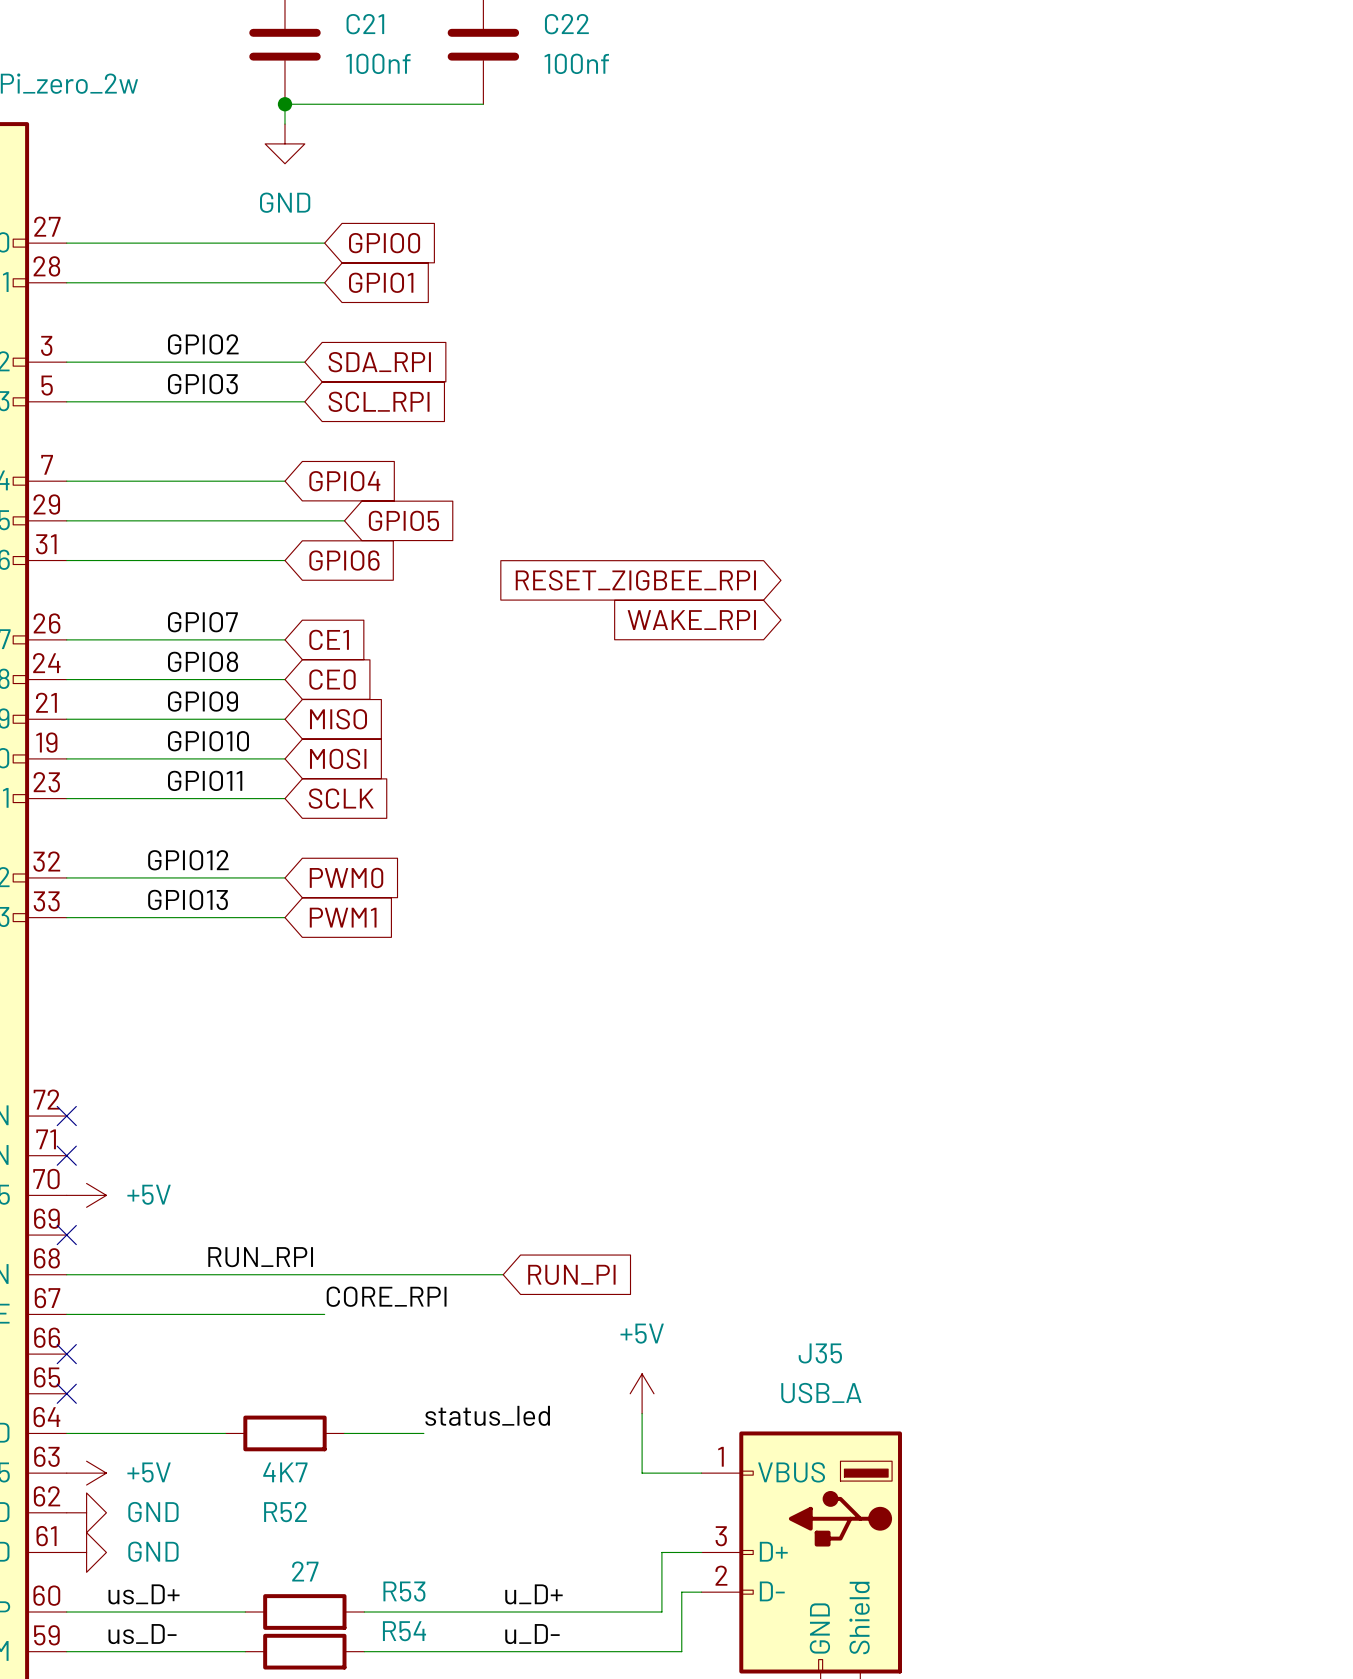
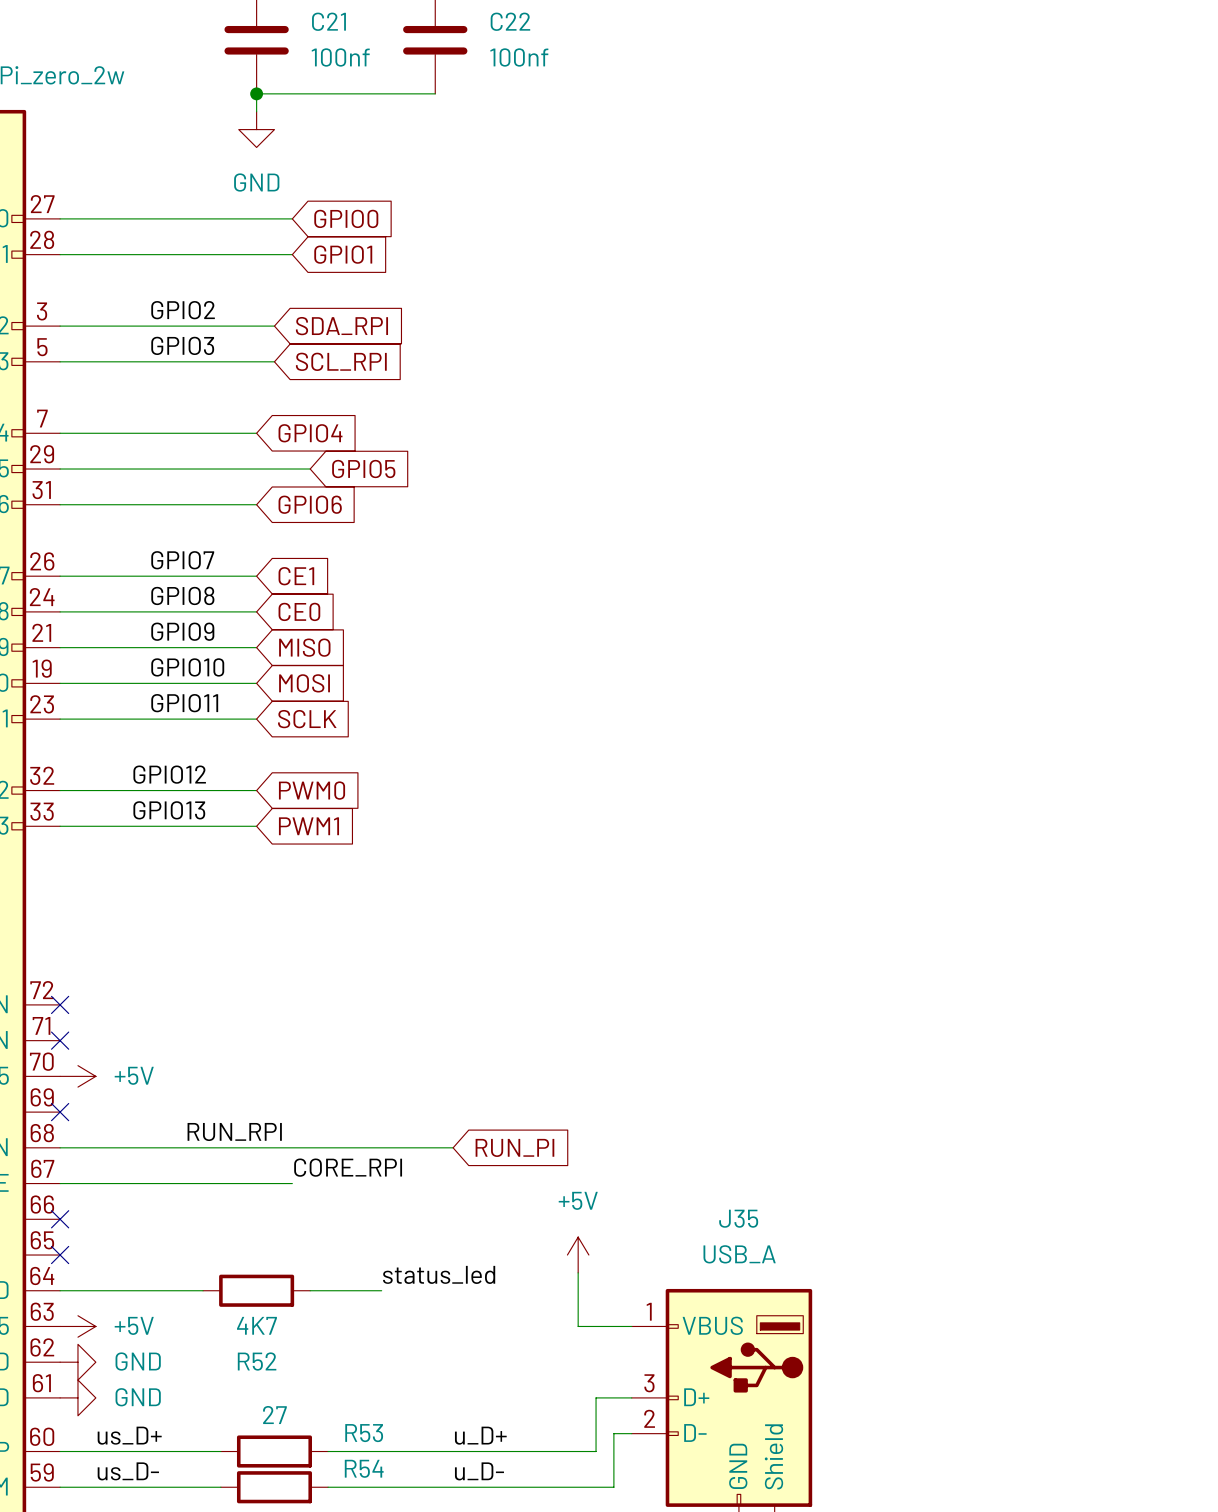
global label: RESET_ZIGBEE_RPI (635, 580) -> none
global label: WAKE_RPI (691, 620) -> none

